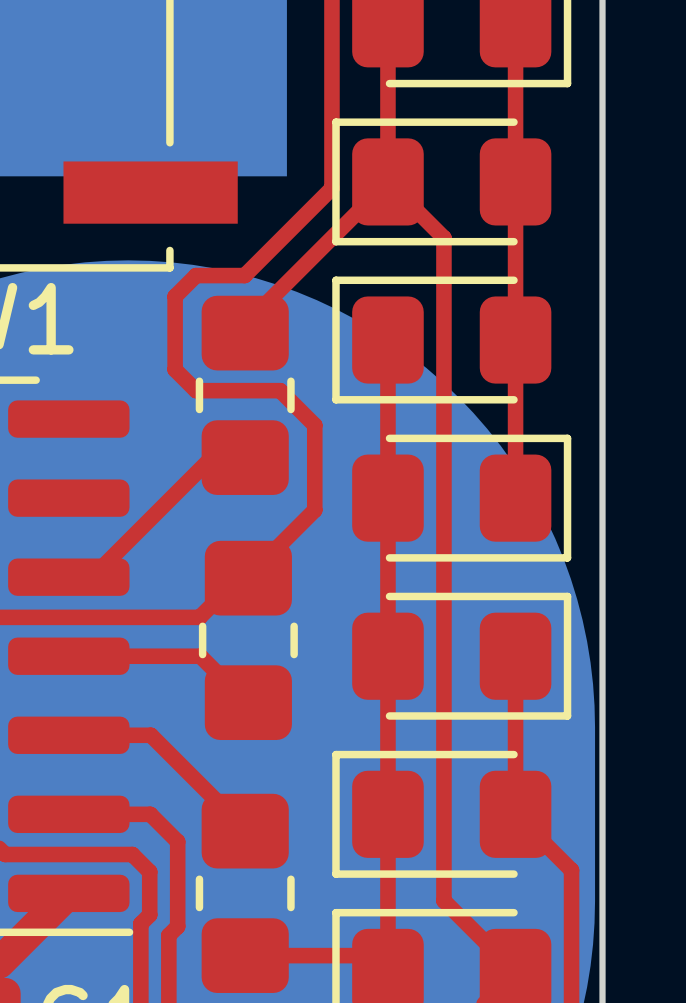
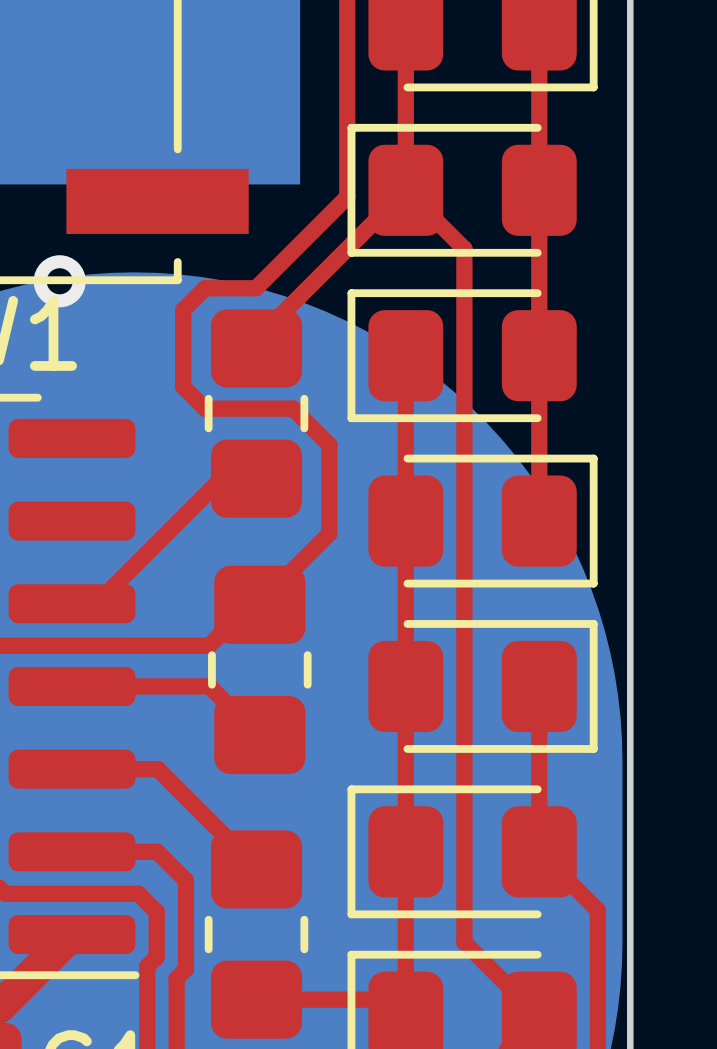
via: none -> (59, 281)

